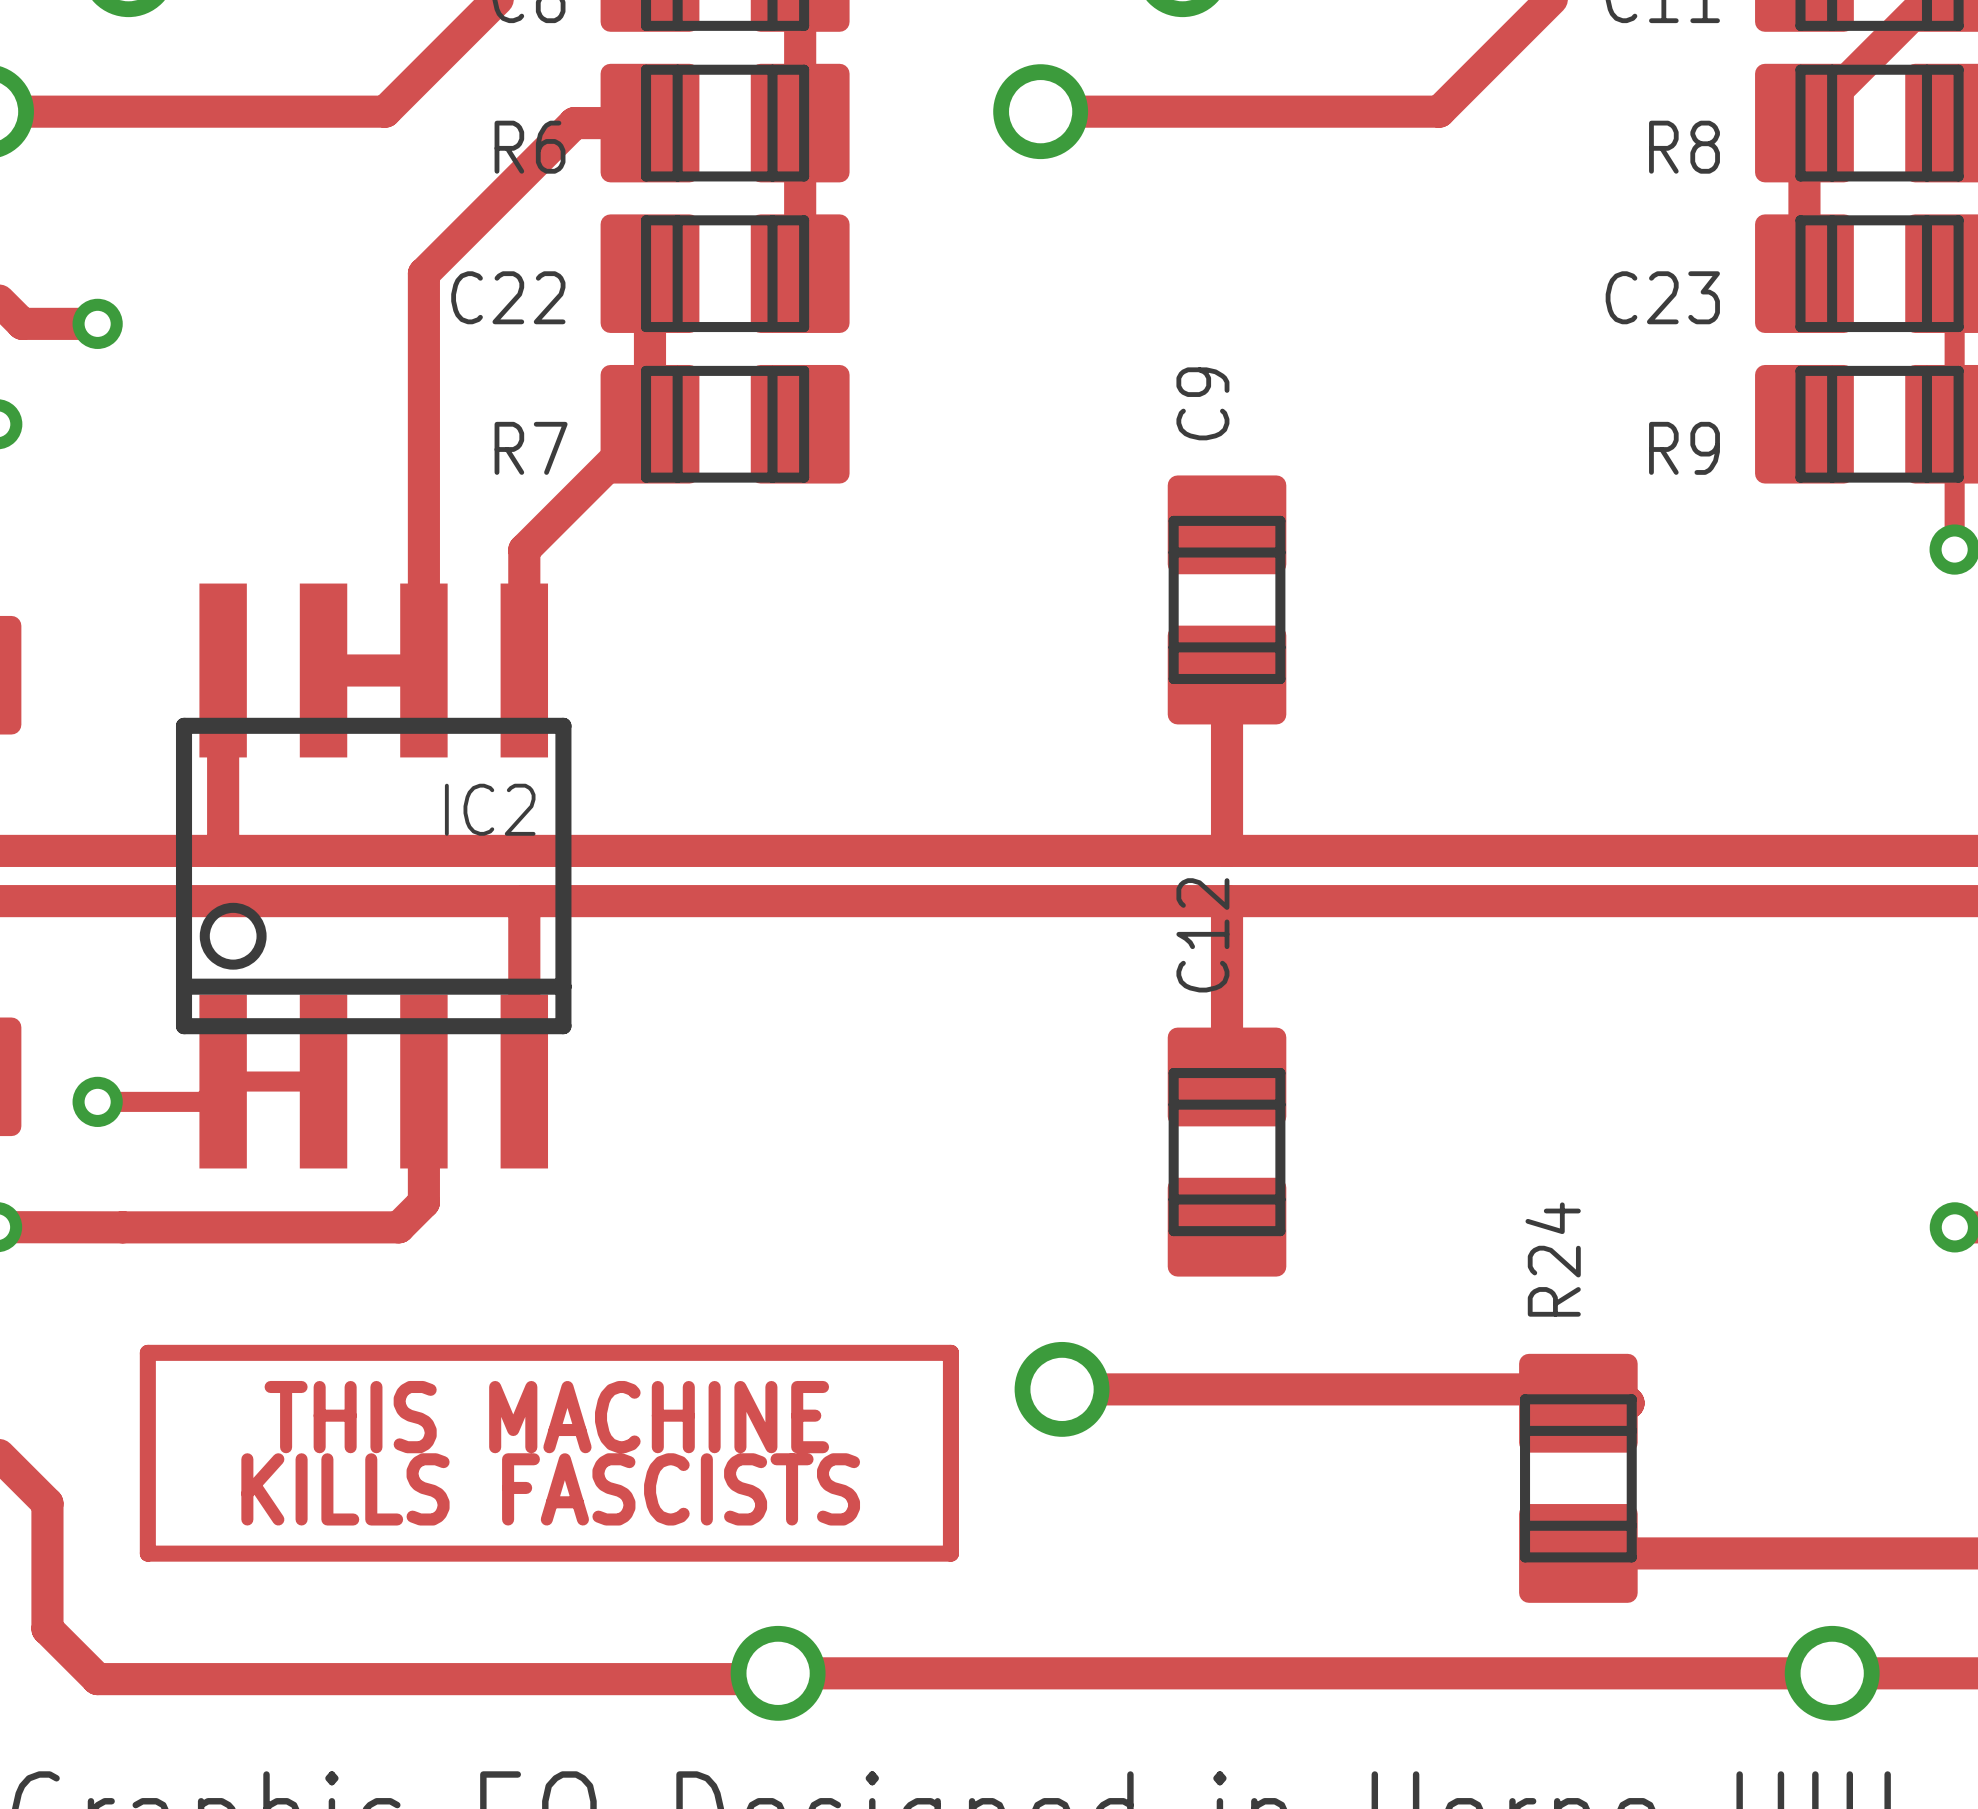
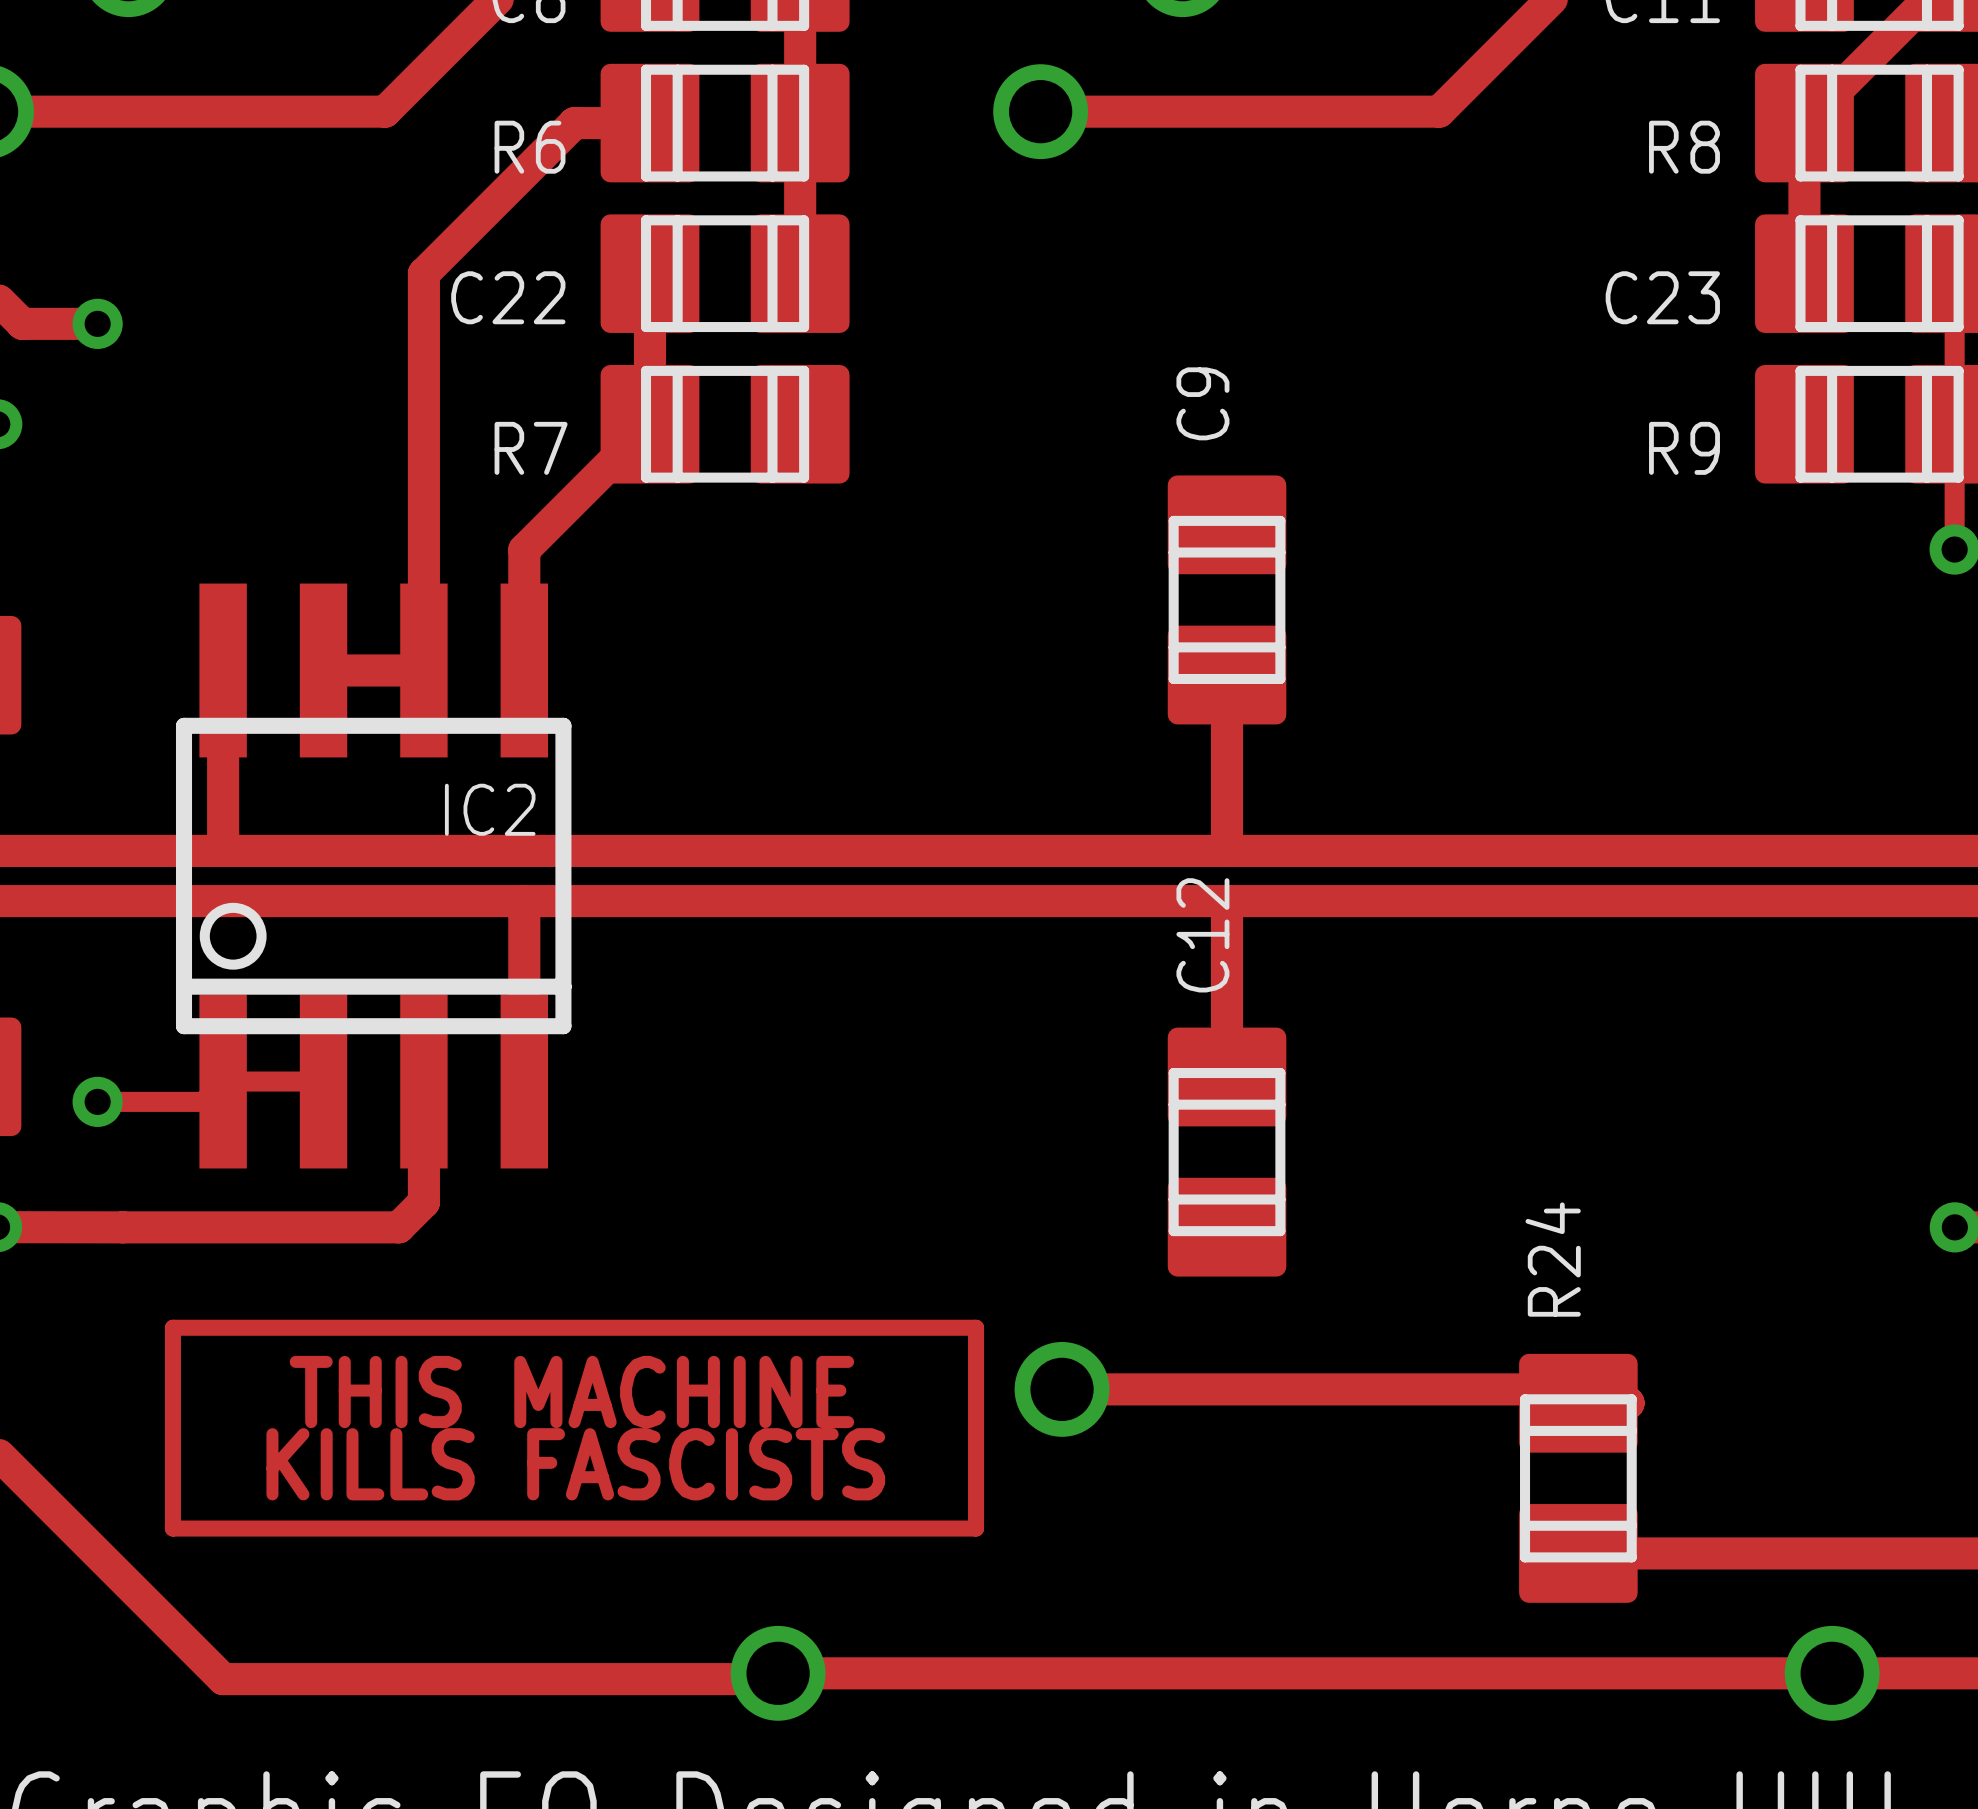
drawing position: (549, 1453) -> (574, 1428)
track: (47, 1503) (47, 1628) (97, 1679) (223, 1679) -> (47, 1503) (223, 1679)

